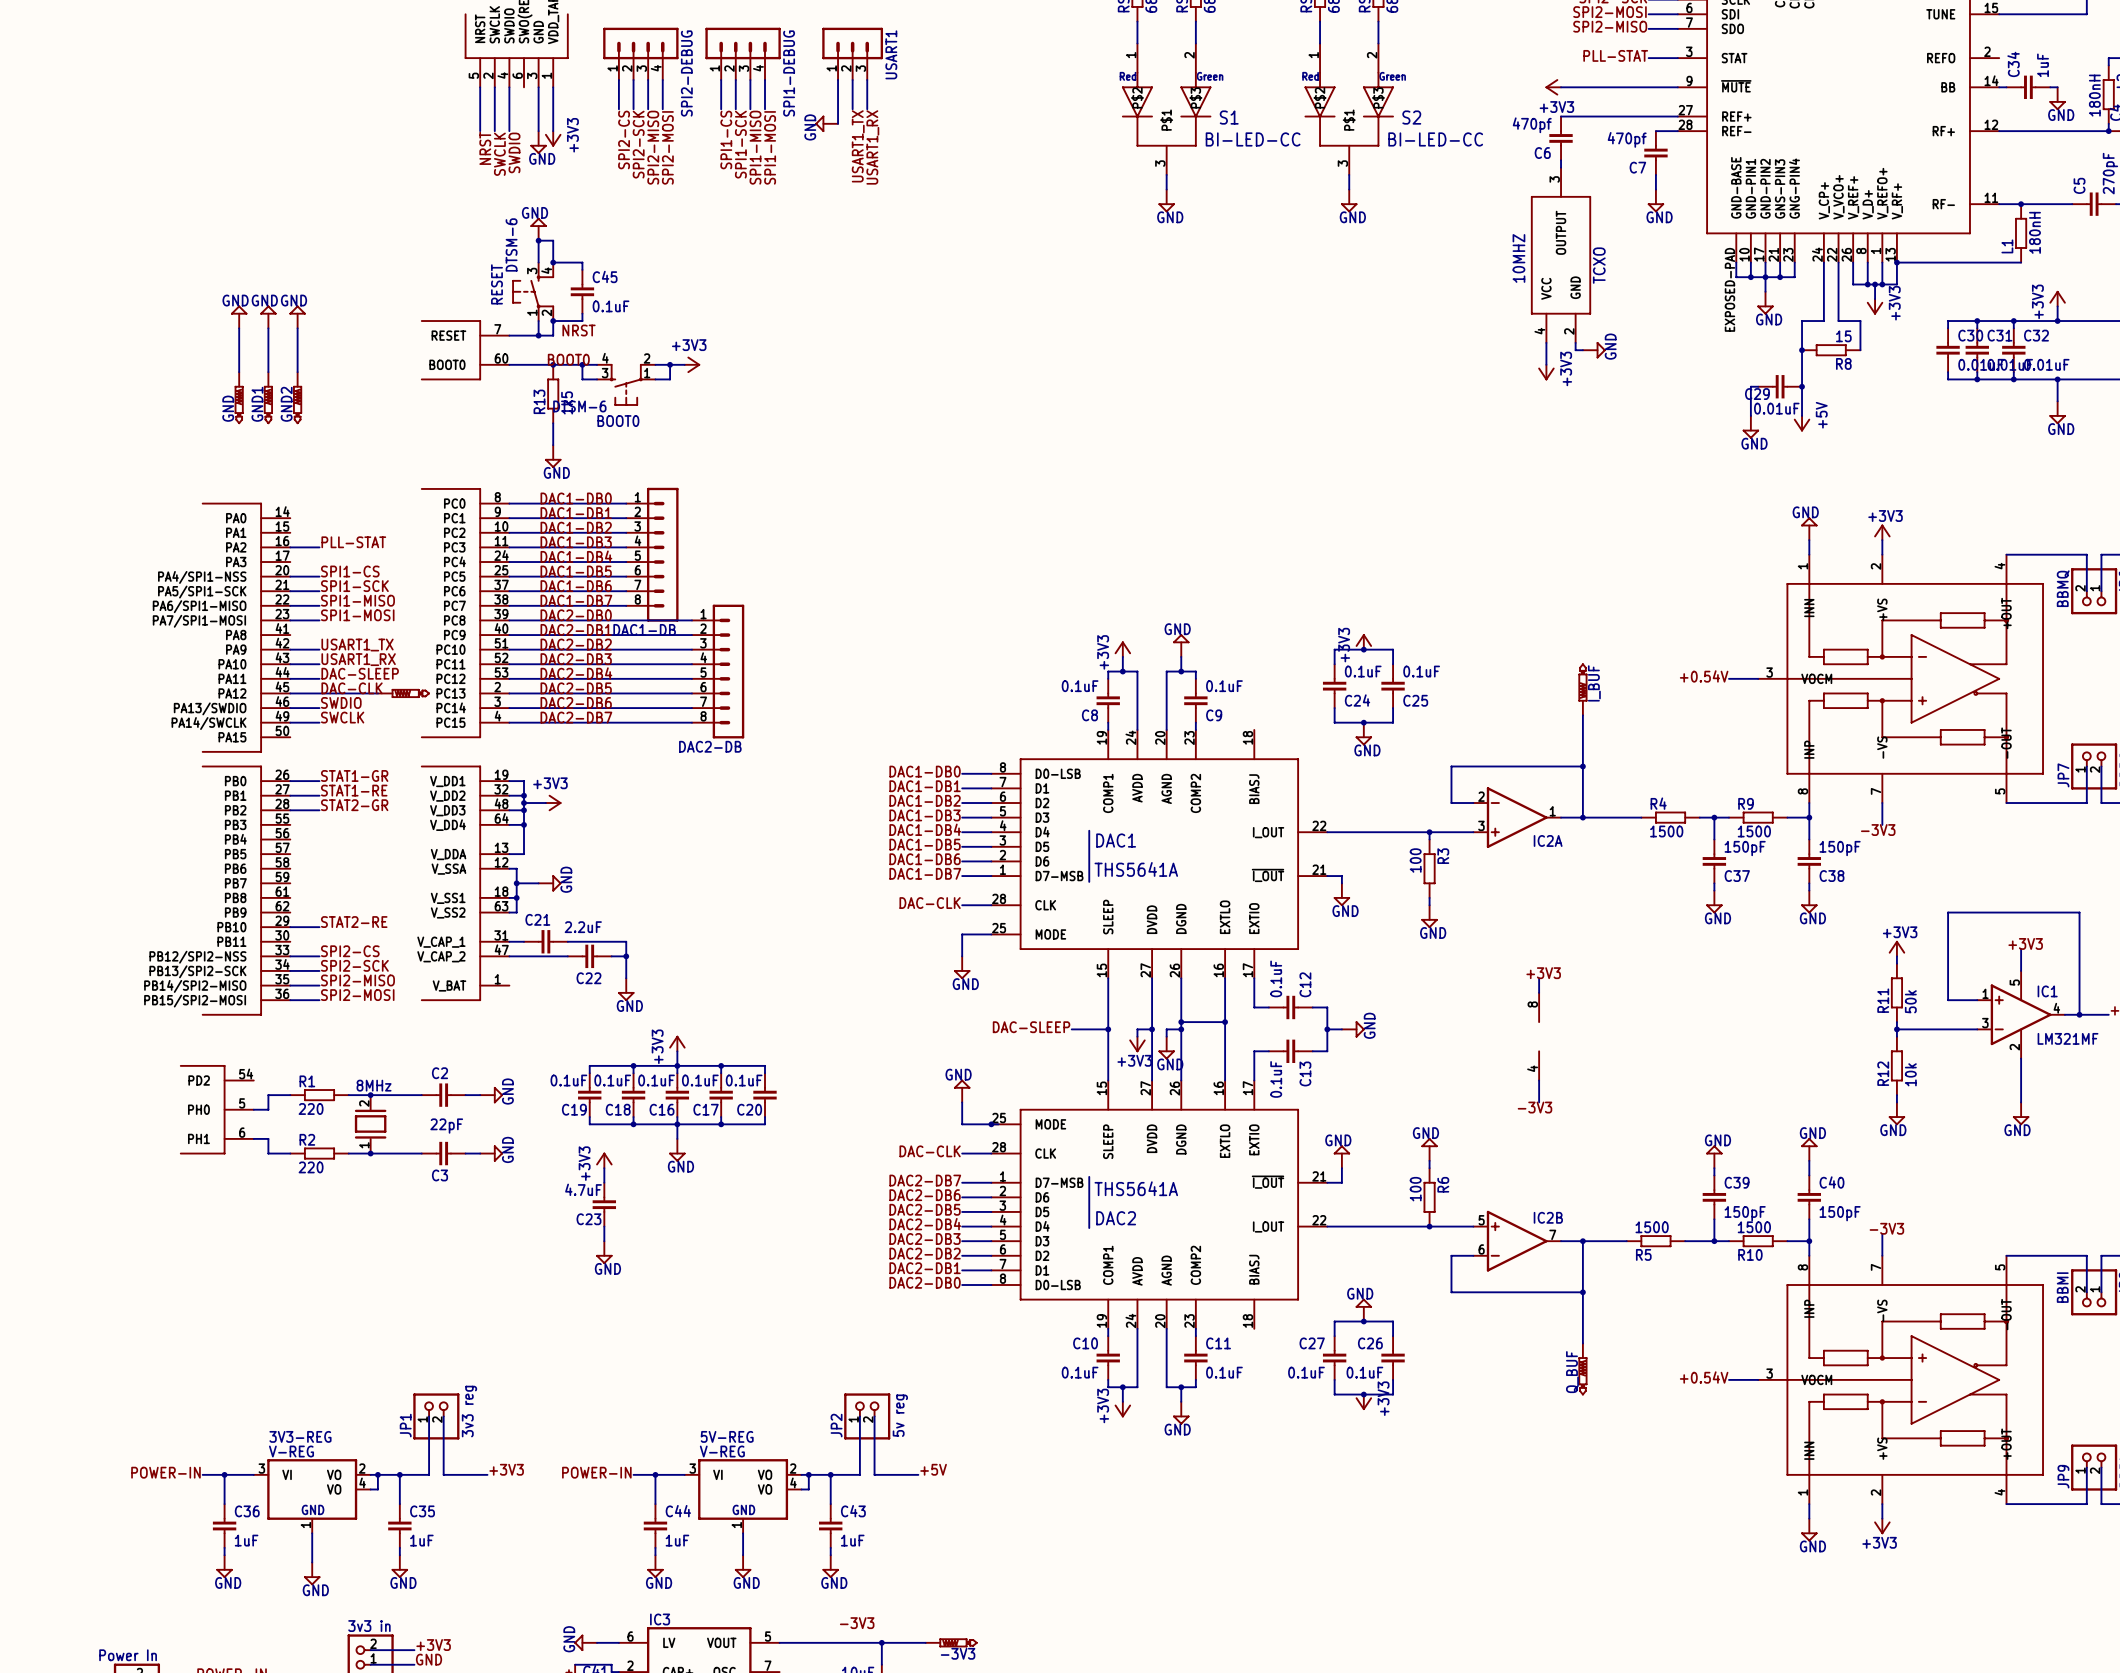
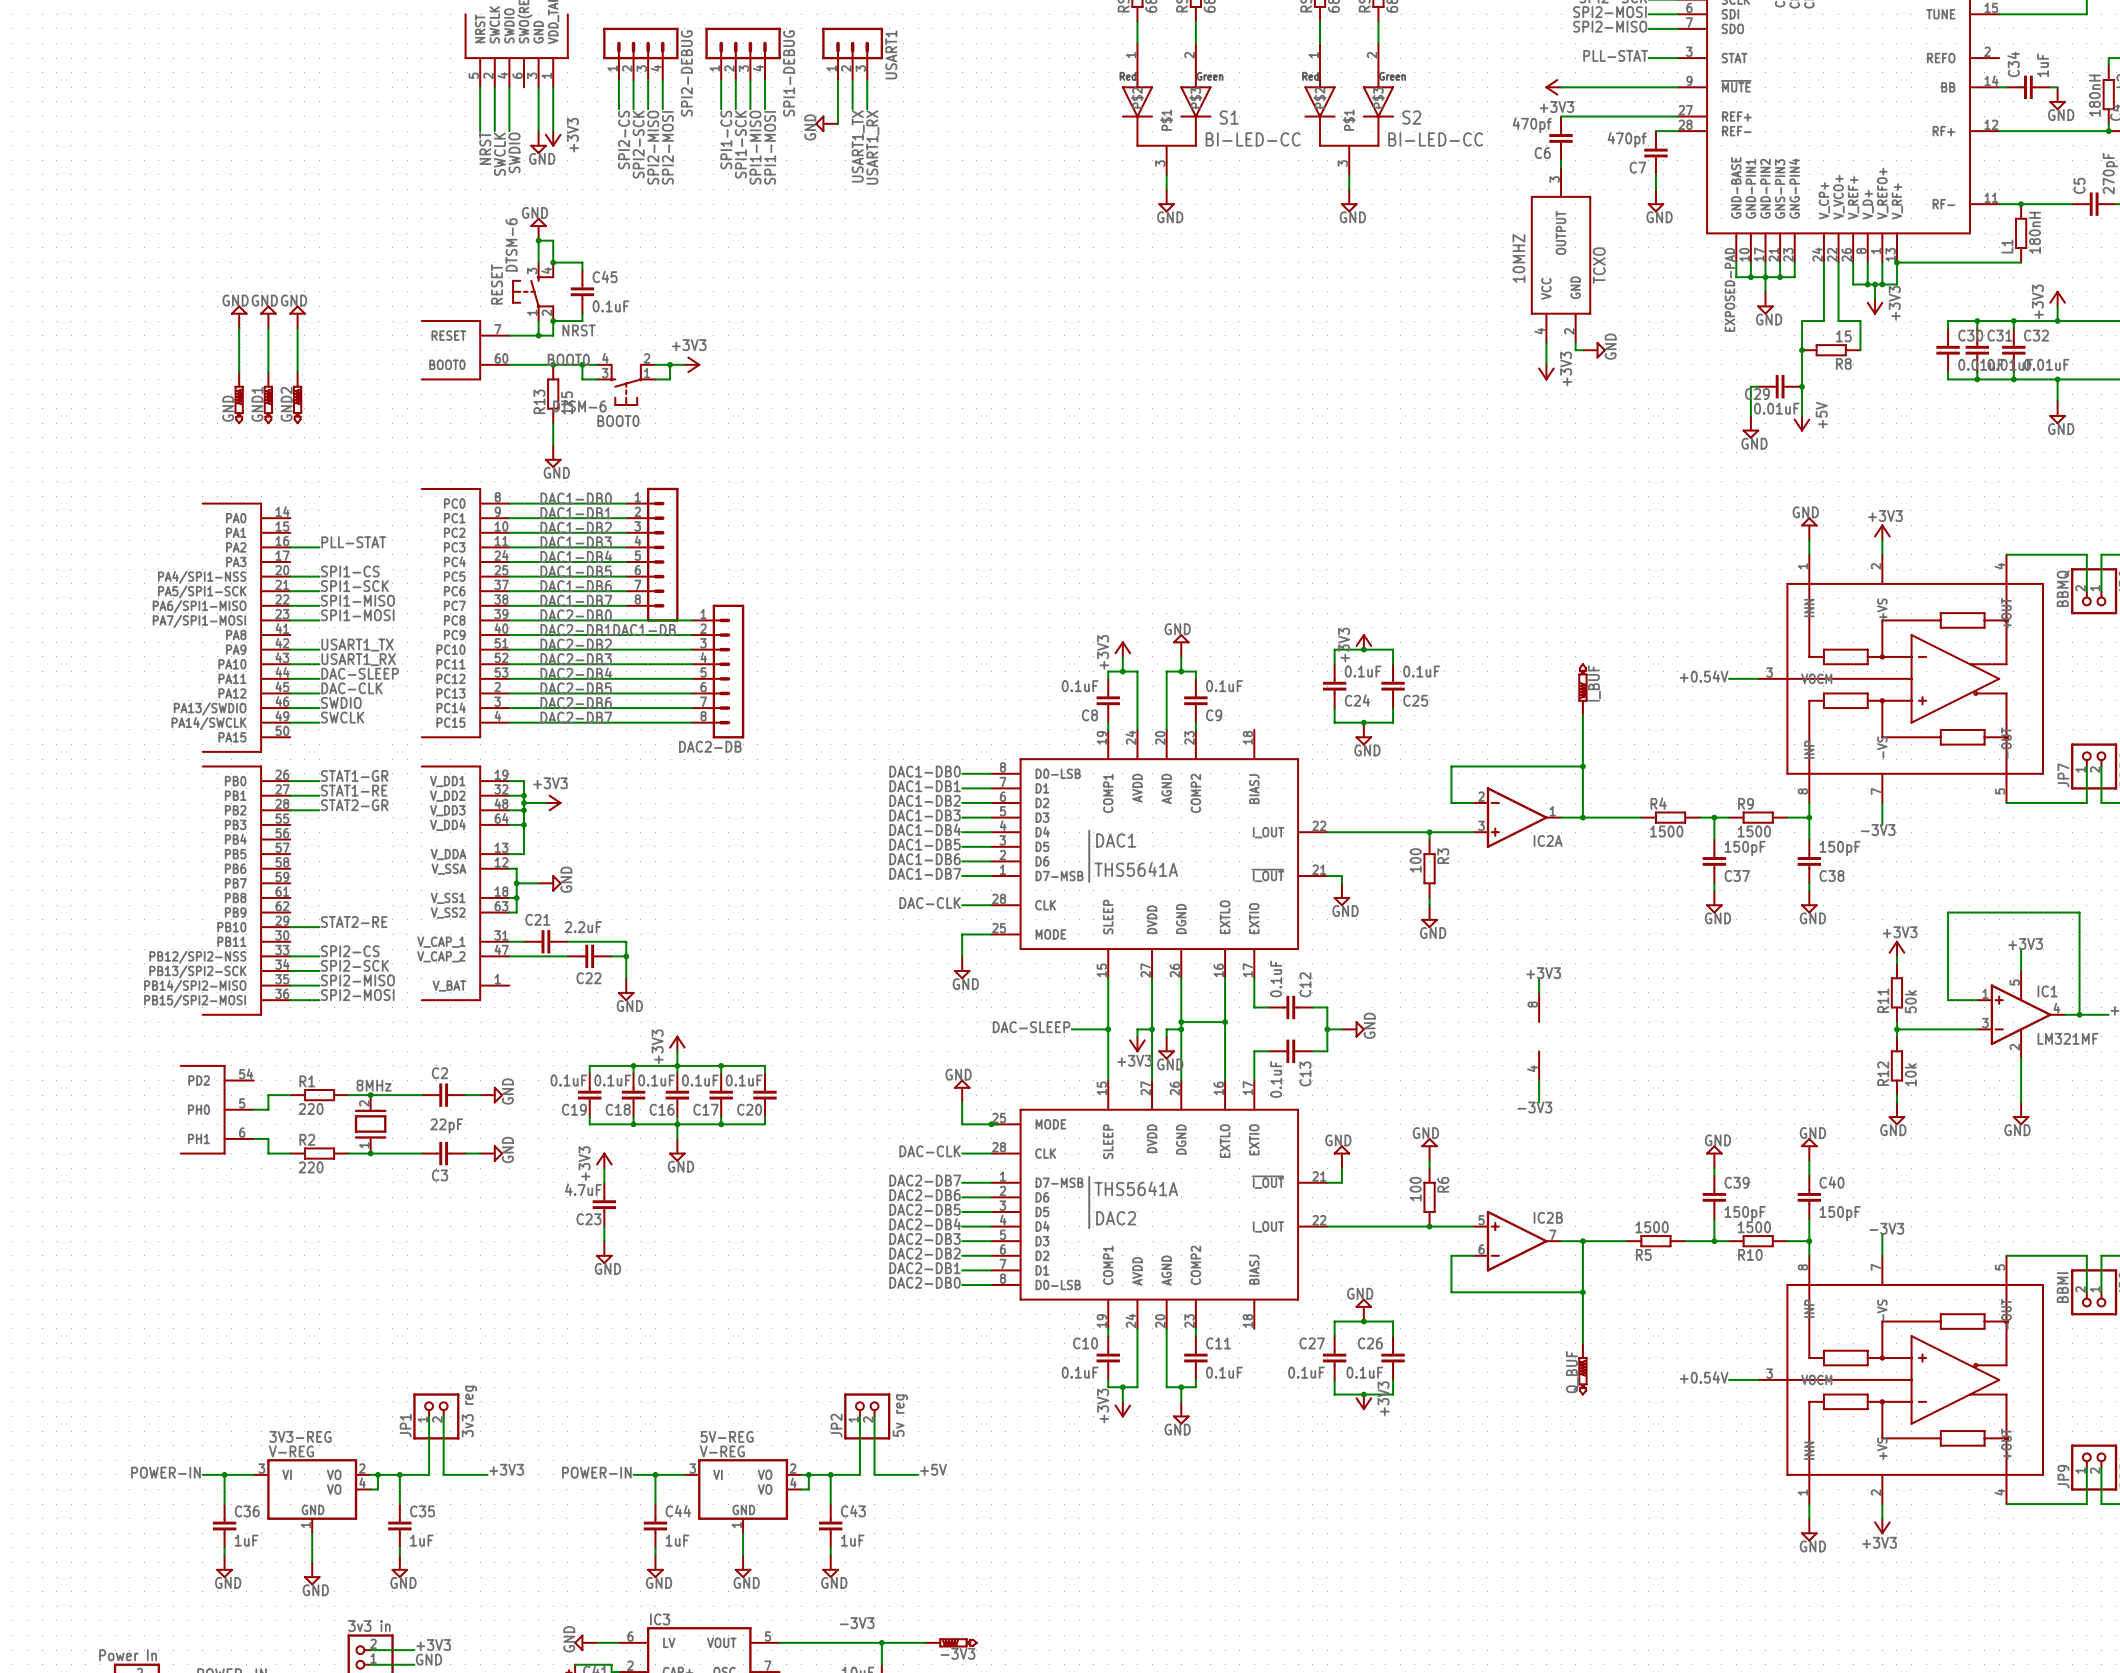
wire: (319, 693) (377, 693) -> none
part: (403, 693) -> none

